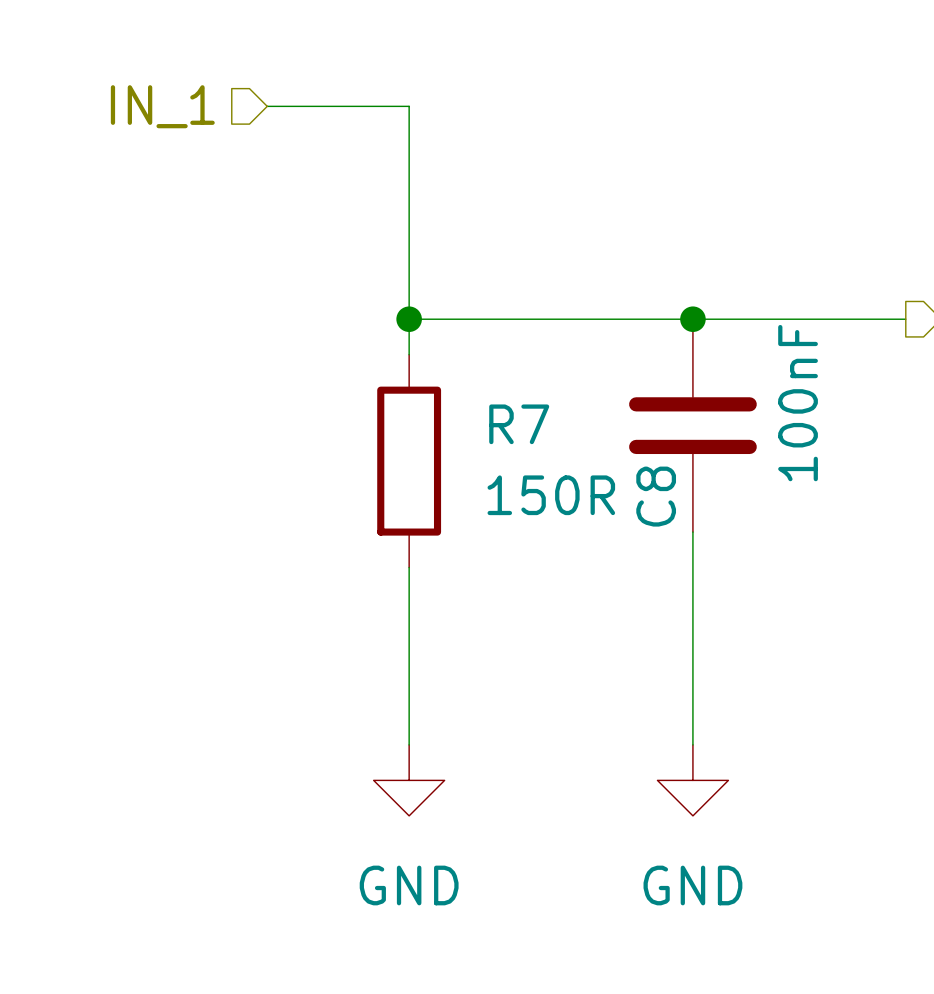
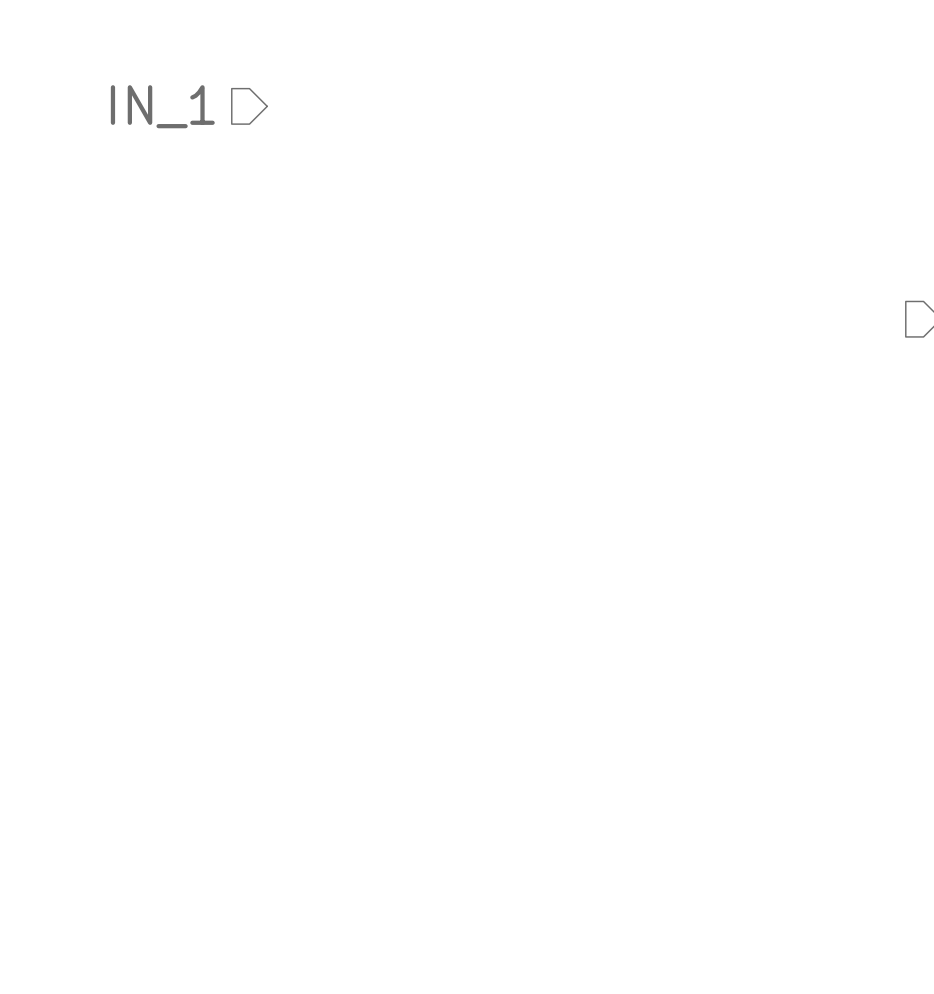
wire: (267, 106) (409, 106) (409, 354) -> none
wire: (409, 319) (905, 319) -> none
junction: (409, 319) -> none
junction: (692, 319) -> none
C8: 100nF (692, 425) -> none
R7: 150R (409, 461) -> none
wire: (692, 532) (692, 744) -> none
wire: (409, 567) (409, 744) -> none
power symbol: GND (409, 780) -> none
power symbol: GND (692, 780) -> none

